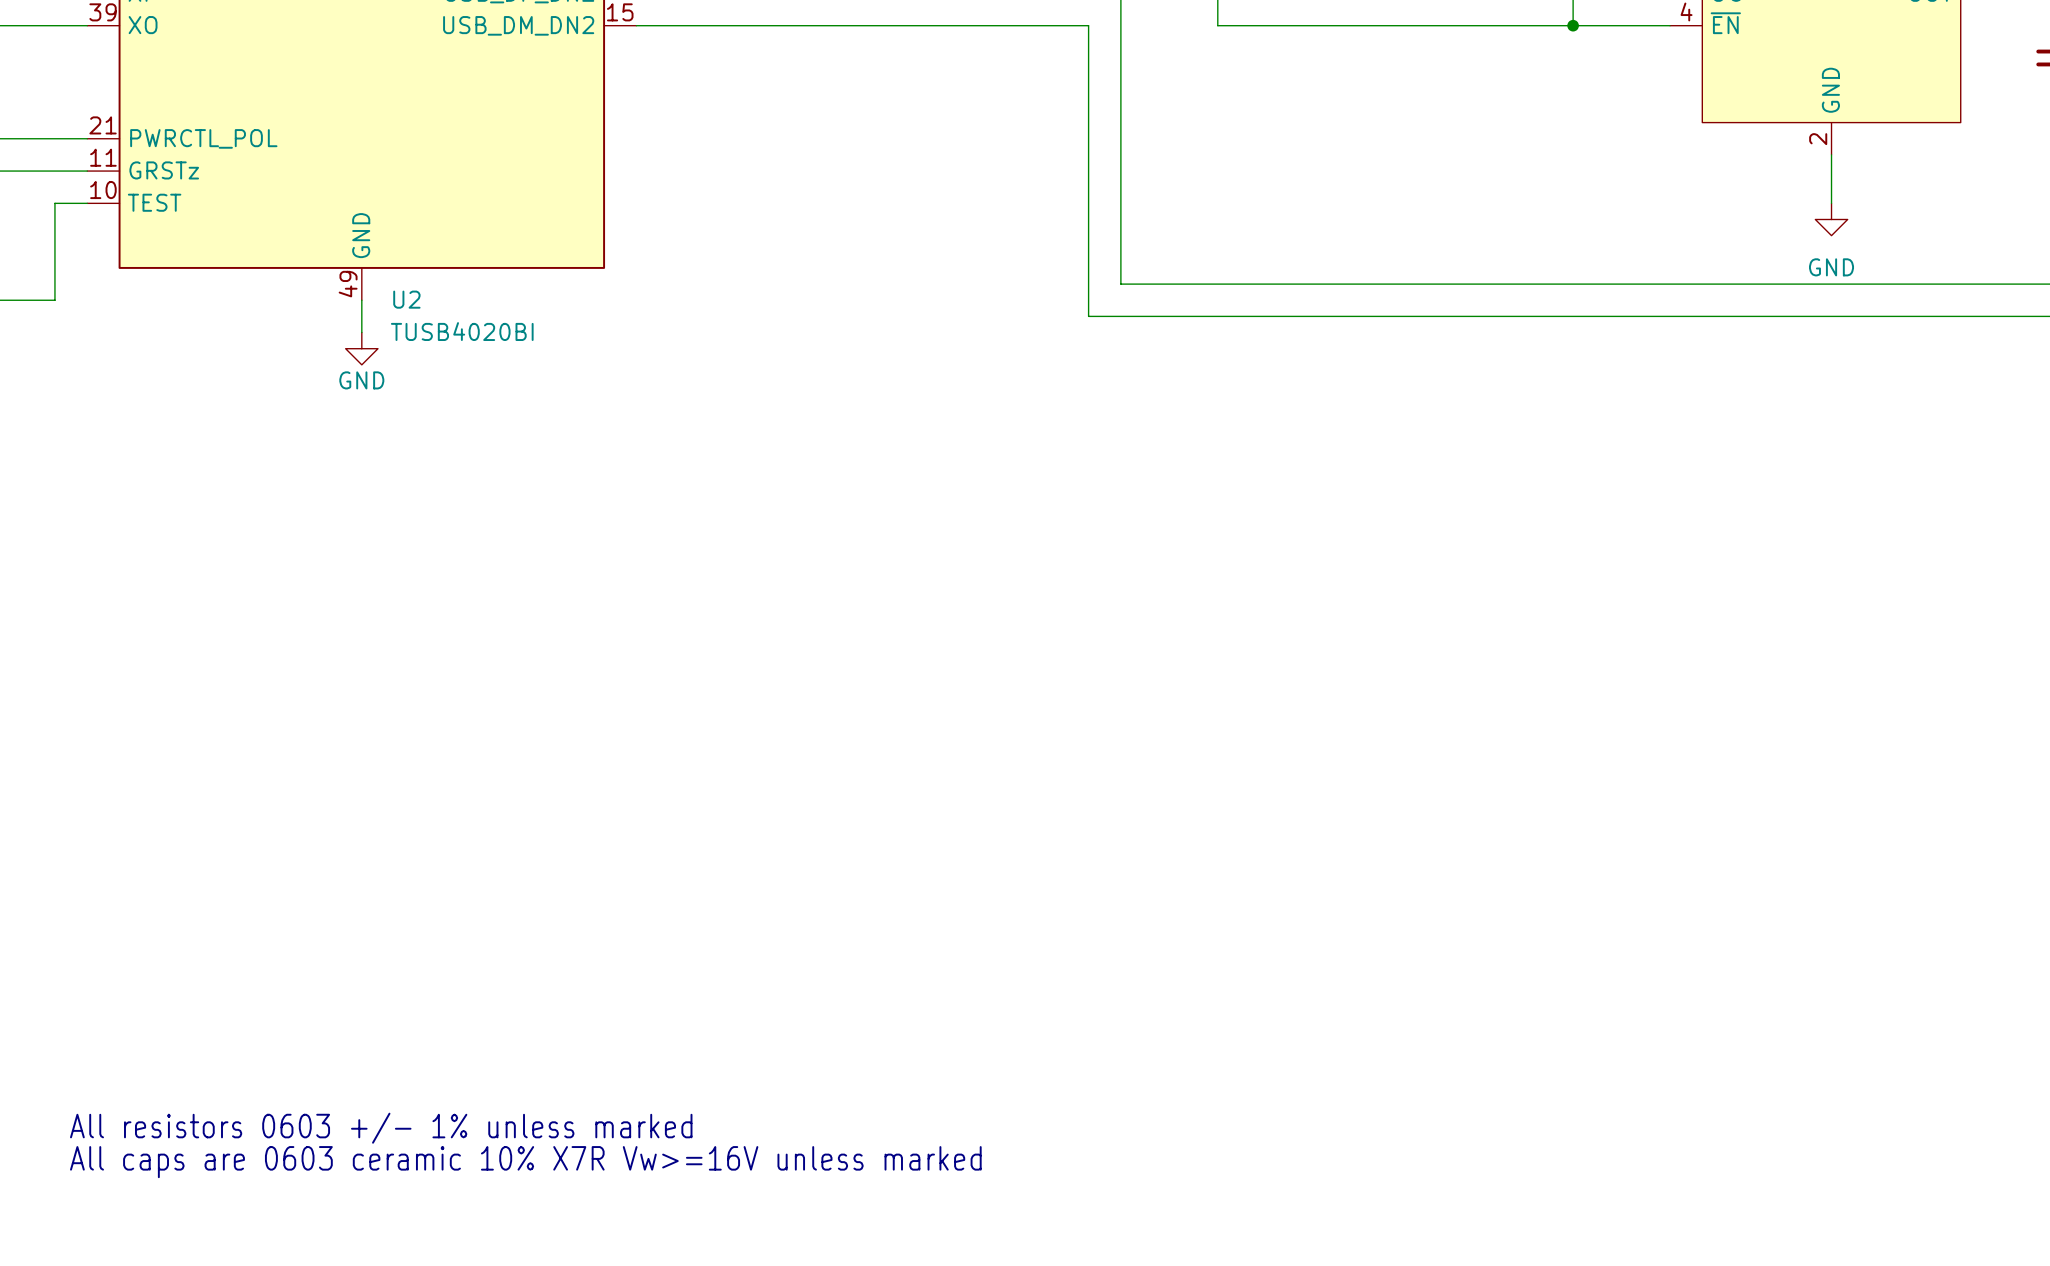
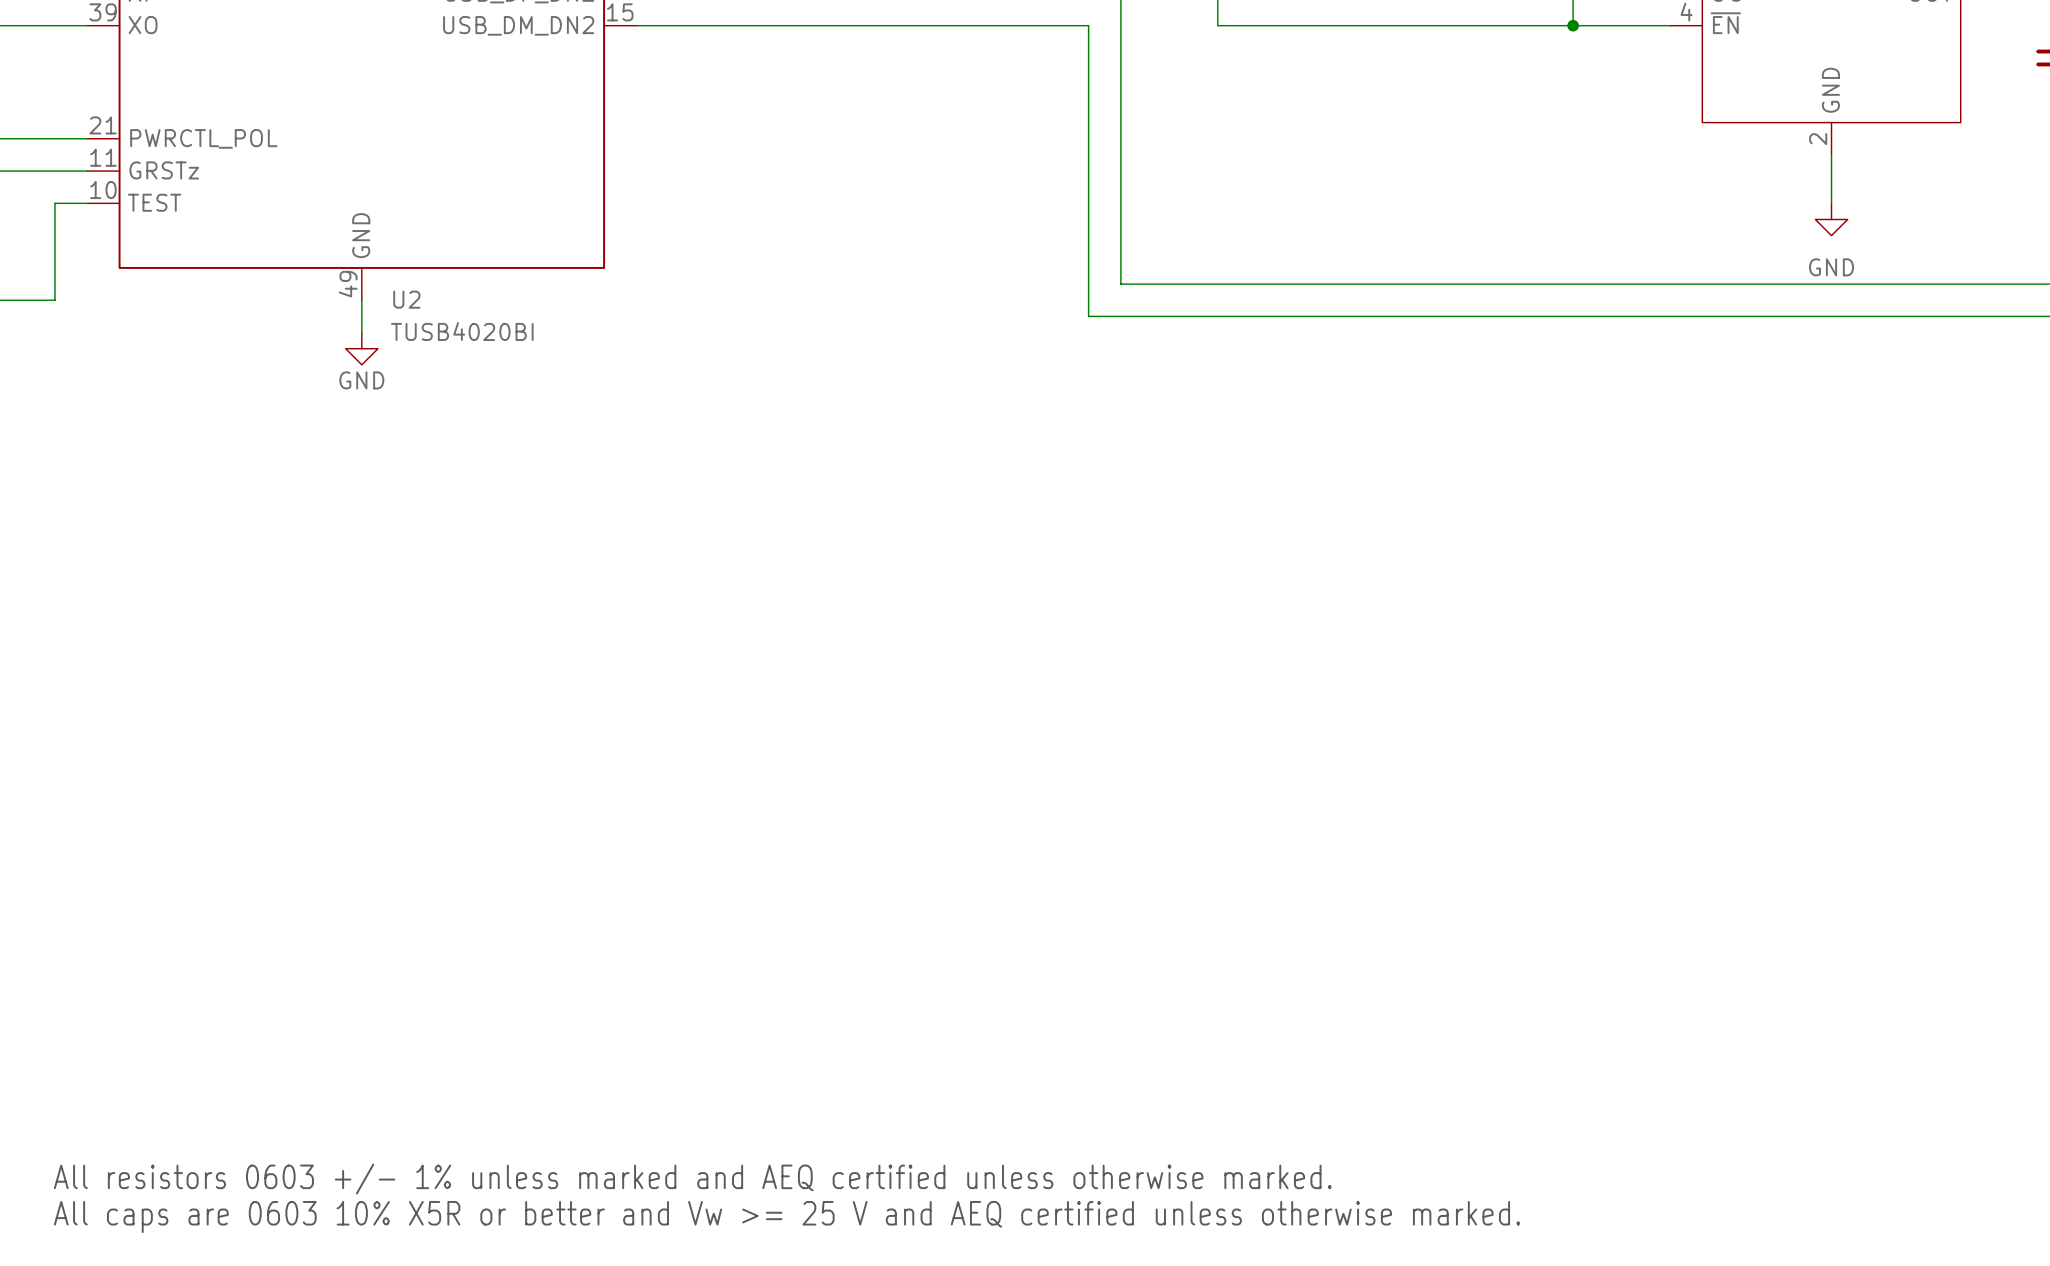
text: All resistors 0603 +/- 1% unless marked (381, 1128) -> none
text: All caps are 0603 ceramic 10% X7R Vw>=16V unless marked (525, 1162) -> none
text: none -> All resistors 0603 +/- 1% unless marked and AEQ certified unless otherwise marked. (692, 1179)
text: none -> All caps are 0603 10% X5R or better and Vw >= 25 V and AEQ certified unless otherwise marked. (786, 1217)

